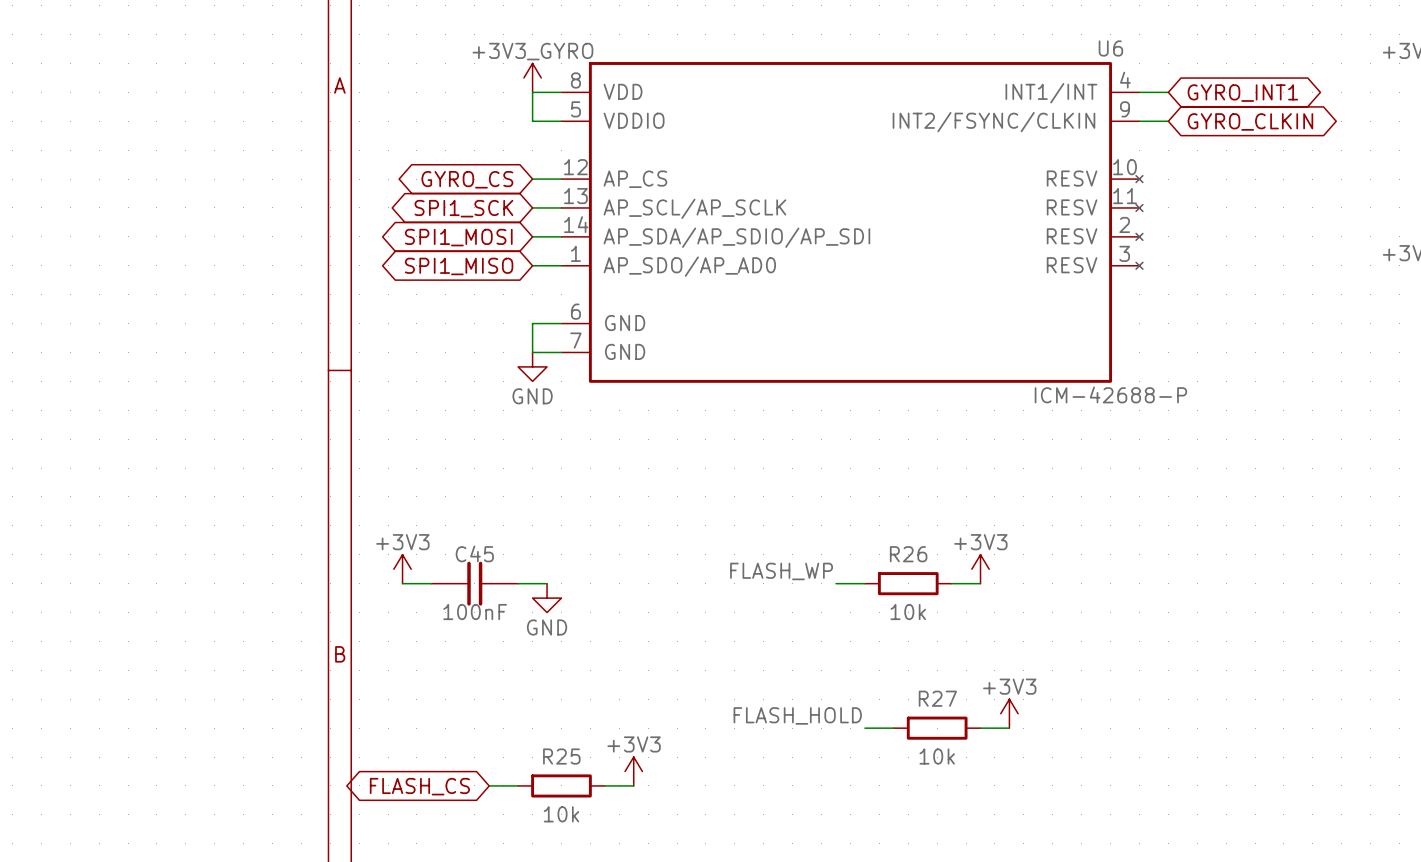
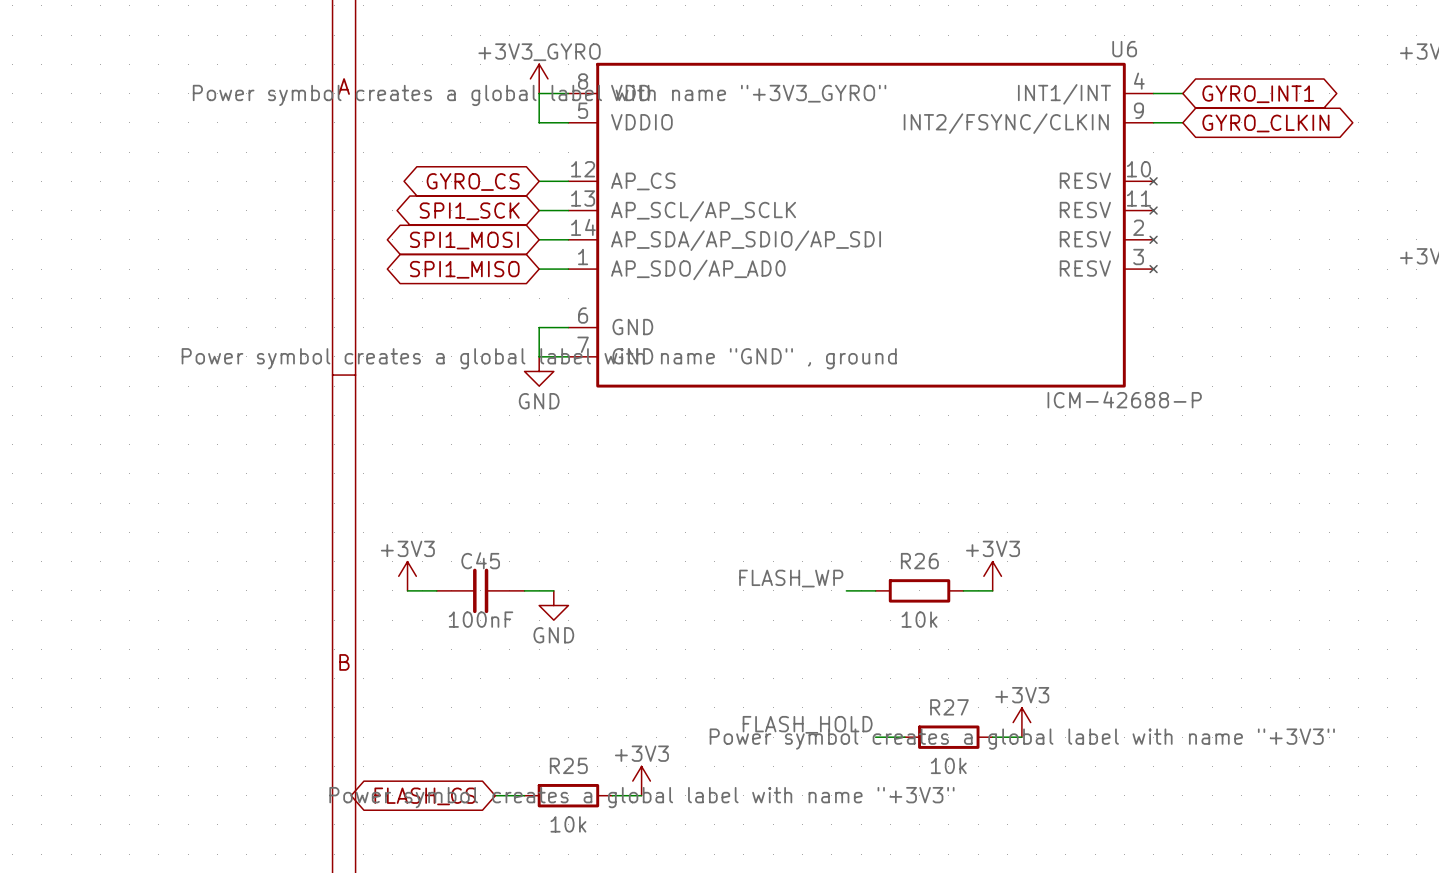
power symbol text: none -> Power symbol creates a global label with name "+3V3_GYRO" (539, 95)
power symbol text: none -> Power symbol creates a global label with name "GND" , ground (539, 358)
power symbol text: none -> Power symbol creates a global label with name "+3V3" (1022, 739)
power symbol text: none -> Power symbol creates a global label with name "+3V3" (641, 797)

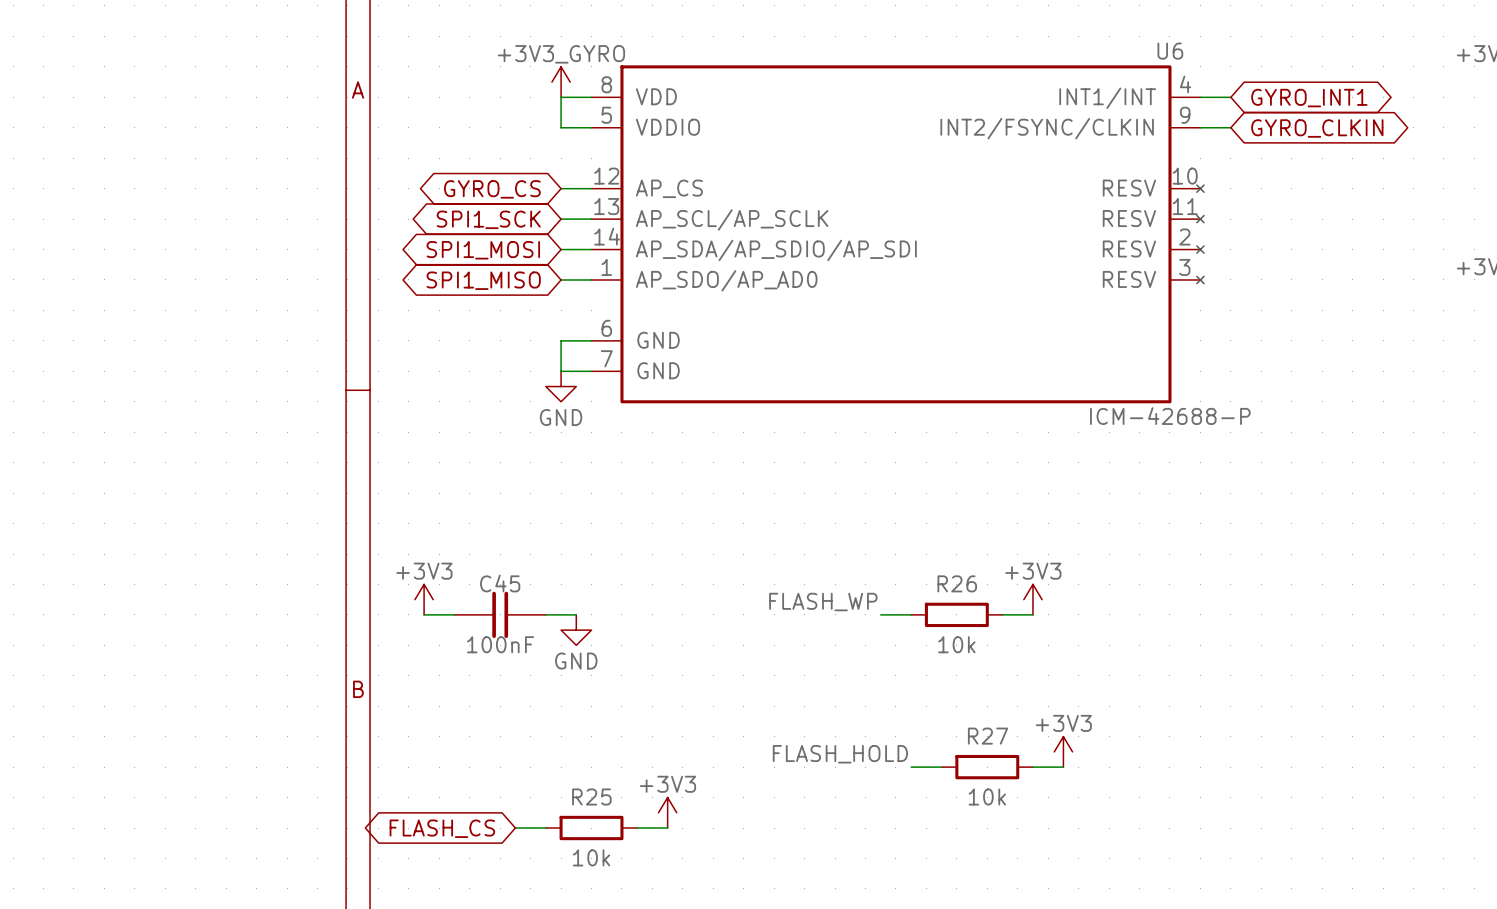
power symbol text: Power symbol creates a global label with name "+3V3_GYRO" (539, 95) -> none
power symbol text: Power symbol creates a global label with name "GND" , ground (539, 358) -> none
power symbol text: Power symbol creates a global label with name "+3V3" (1022, 739) -> none
power symbol text: Power symbol creates a global label with name "+3V3" (641, 797) -> none

